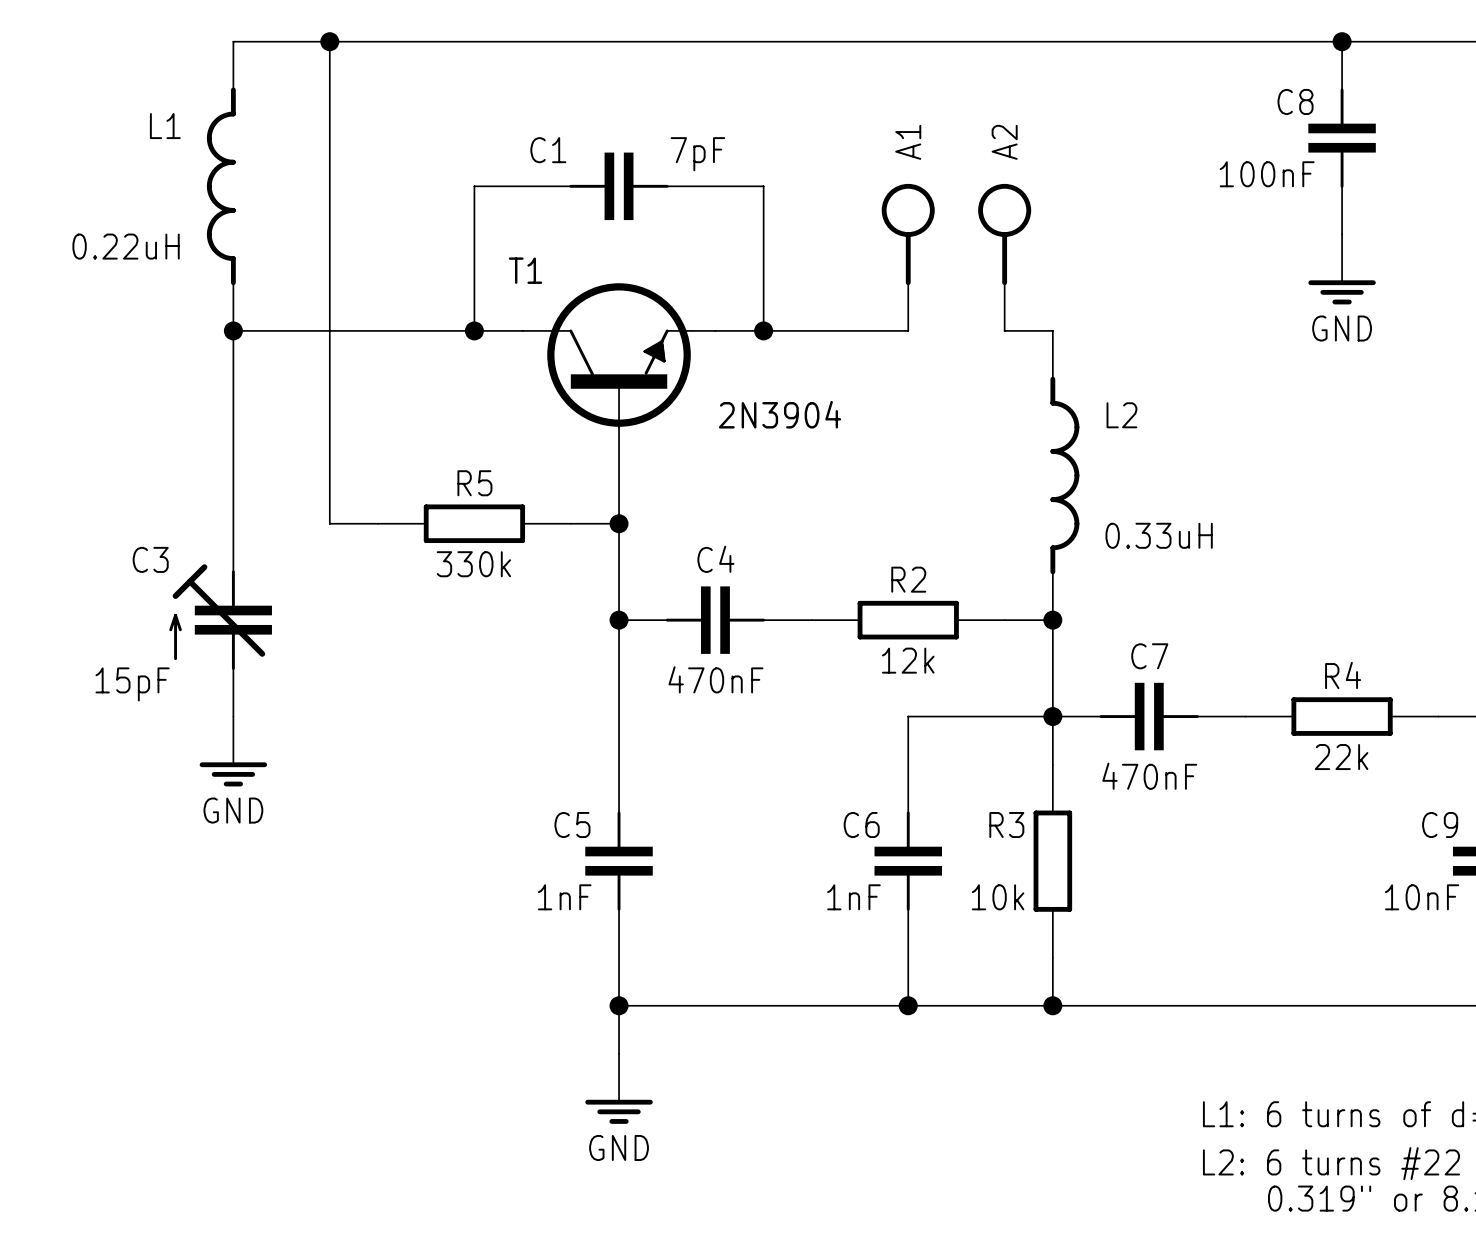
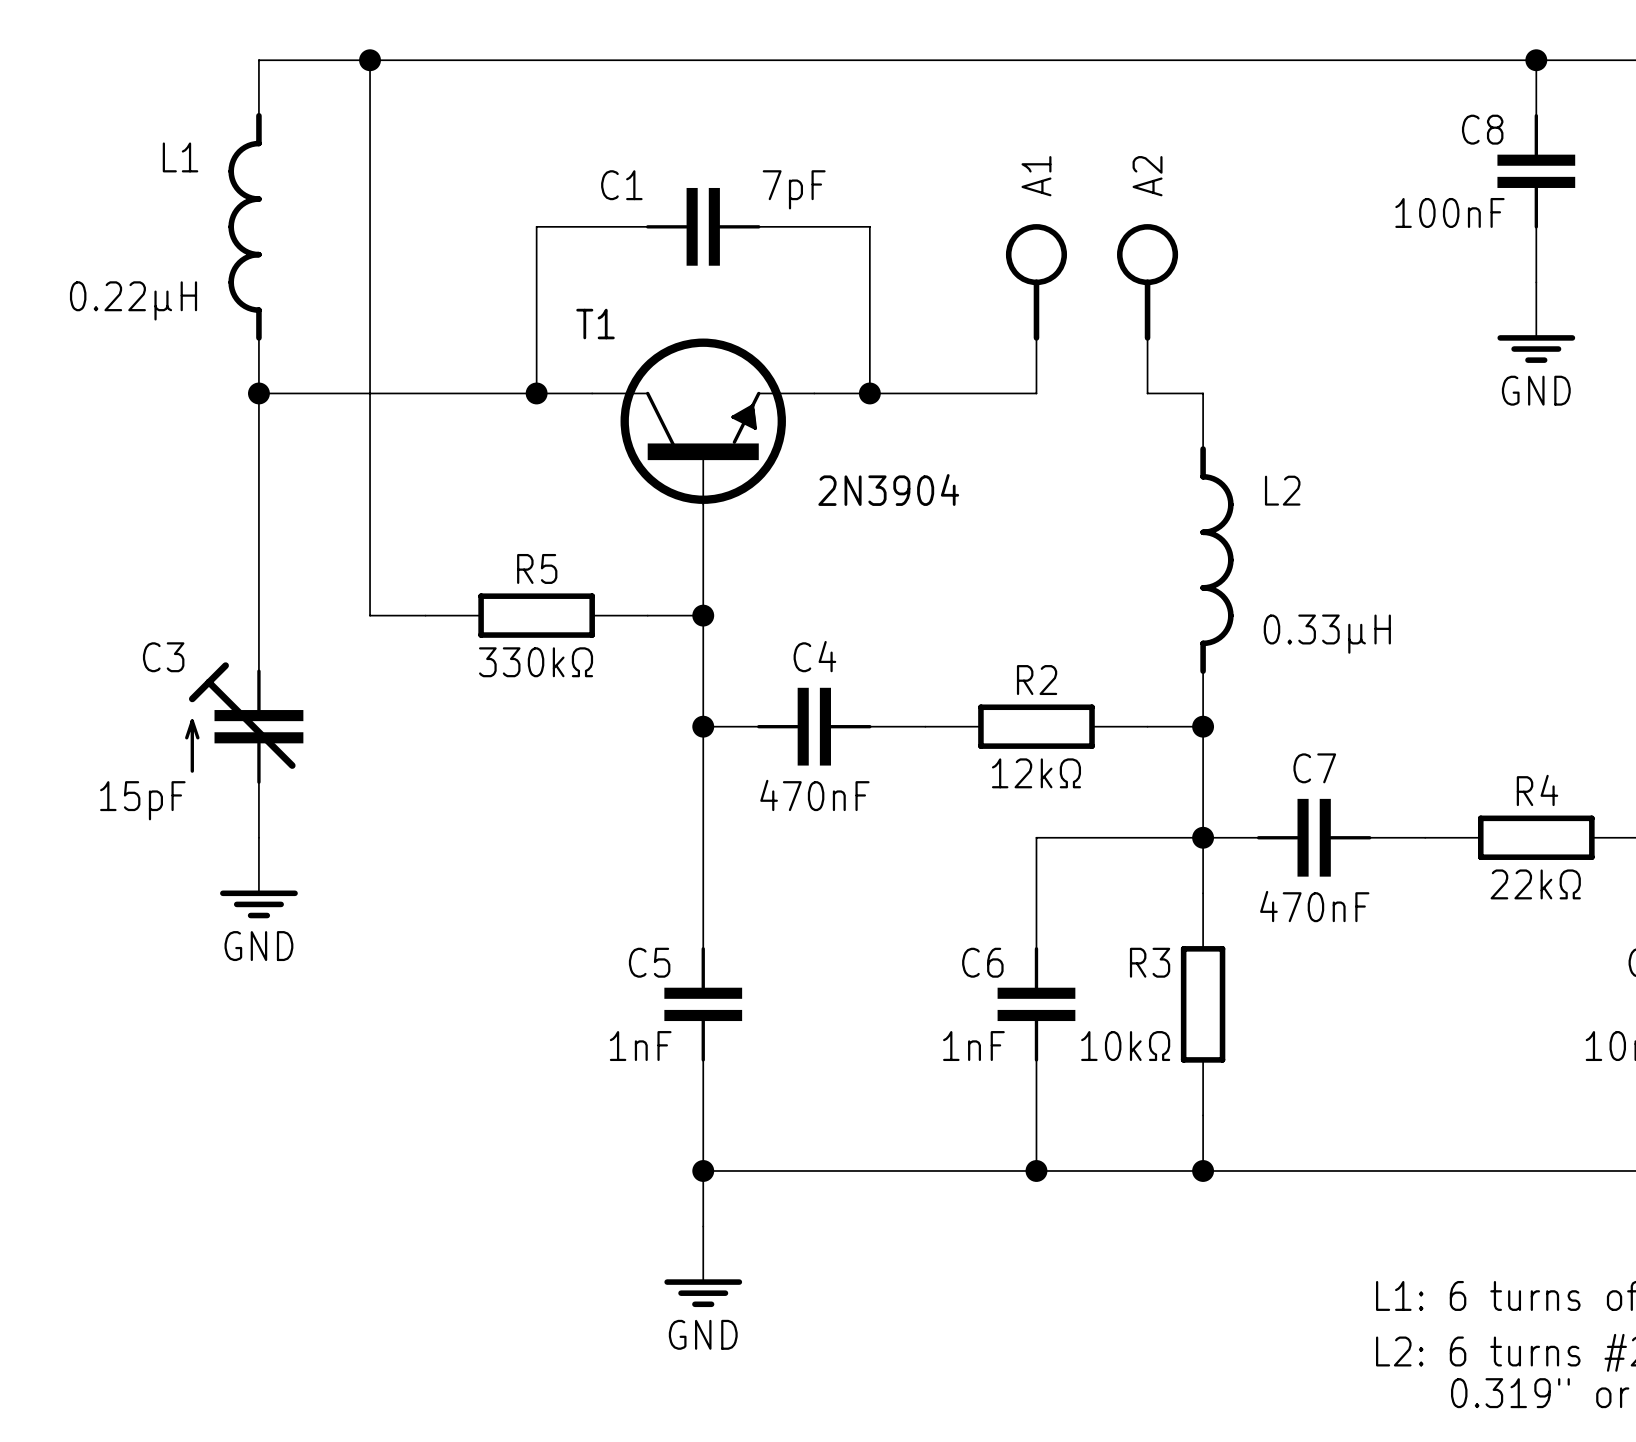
L1 value: 0.22uH (126, 246) -> 0.22μH (133, 300)
L2 value: 0.33uH (1159, 535) -> 0.33μH (1327, 634)
R5 value: 330k (473, 564) -> 330kΩ (536, 662)
R2 value: 12k (908, 660) -> 12kΩ (1036, 773)
R4 value: 22k (1341, 757) -> 22kΩ (1535, 884)
R3 value: 10k (998, 897) -> 10kΩ (1125, 1046)

